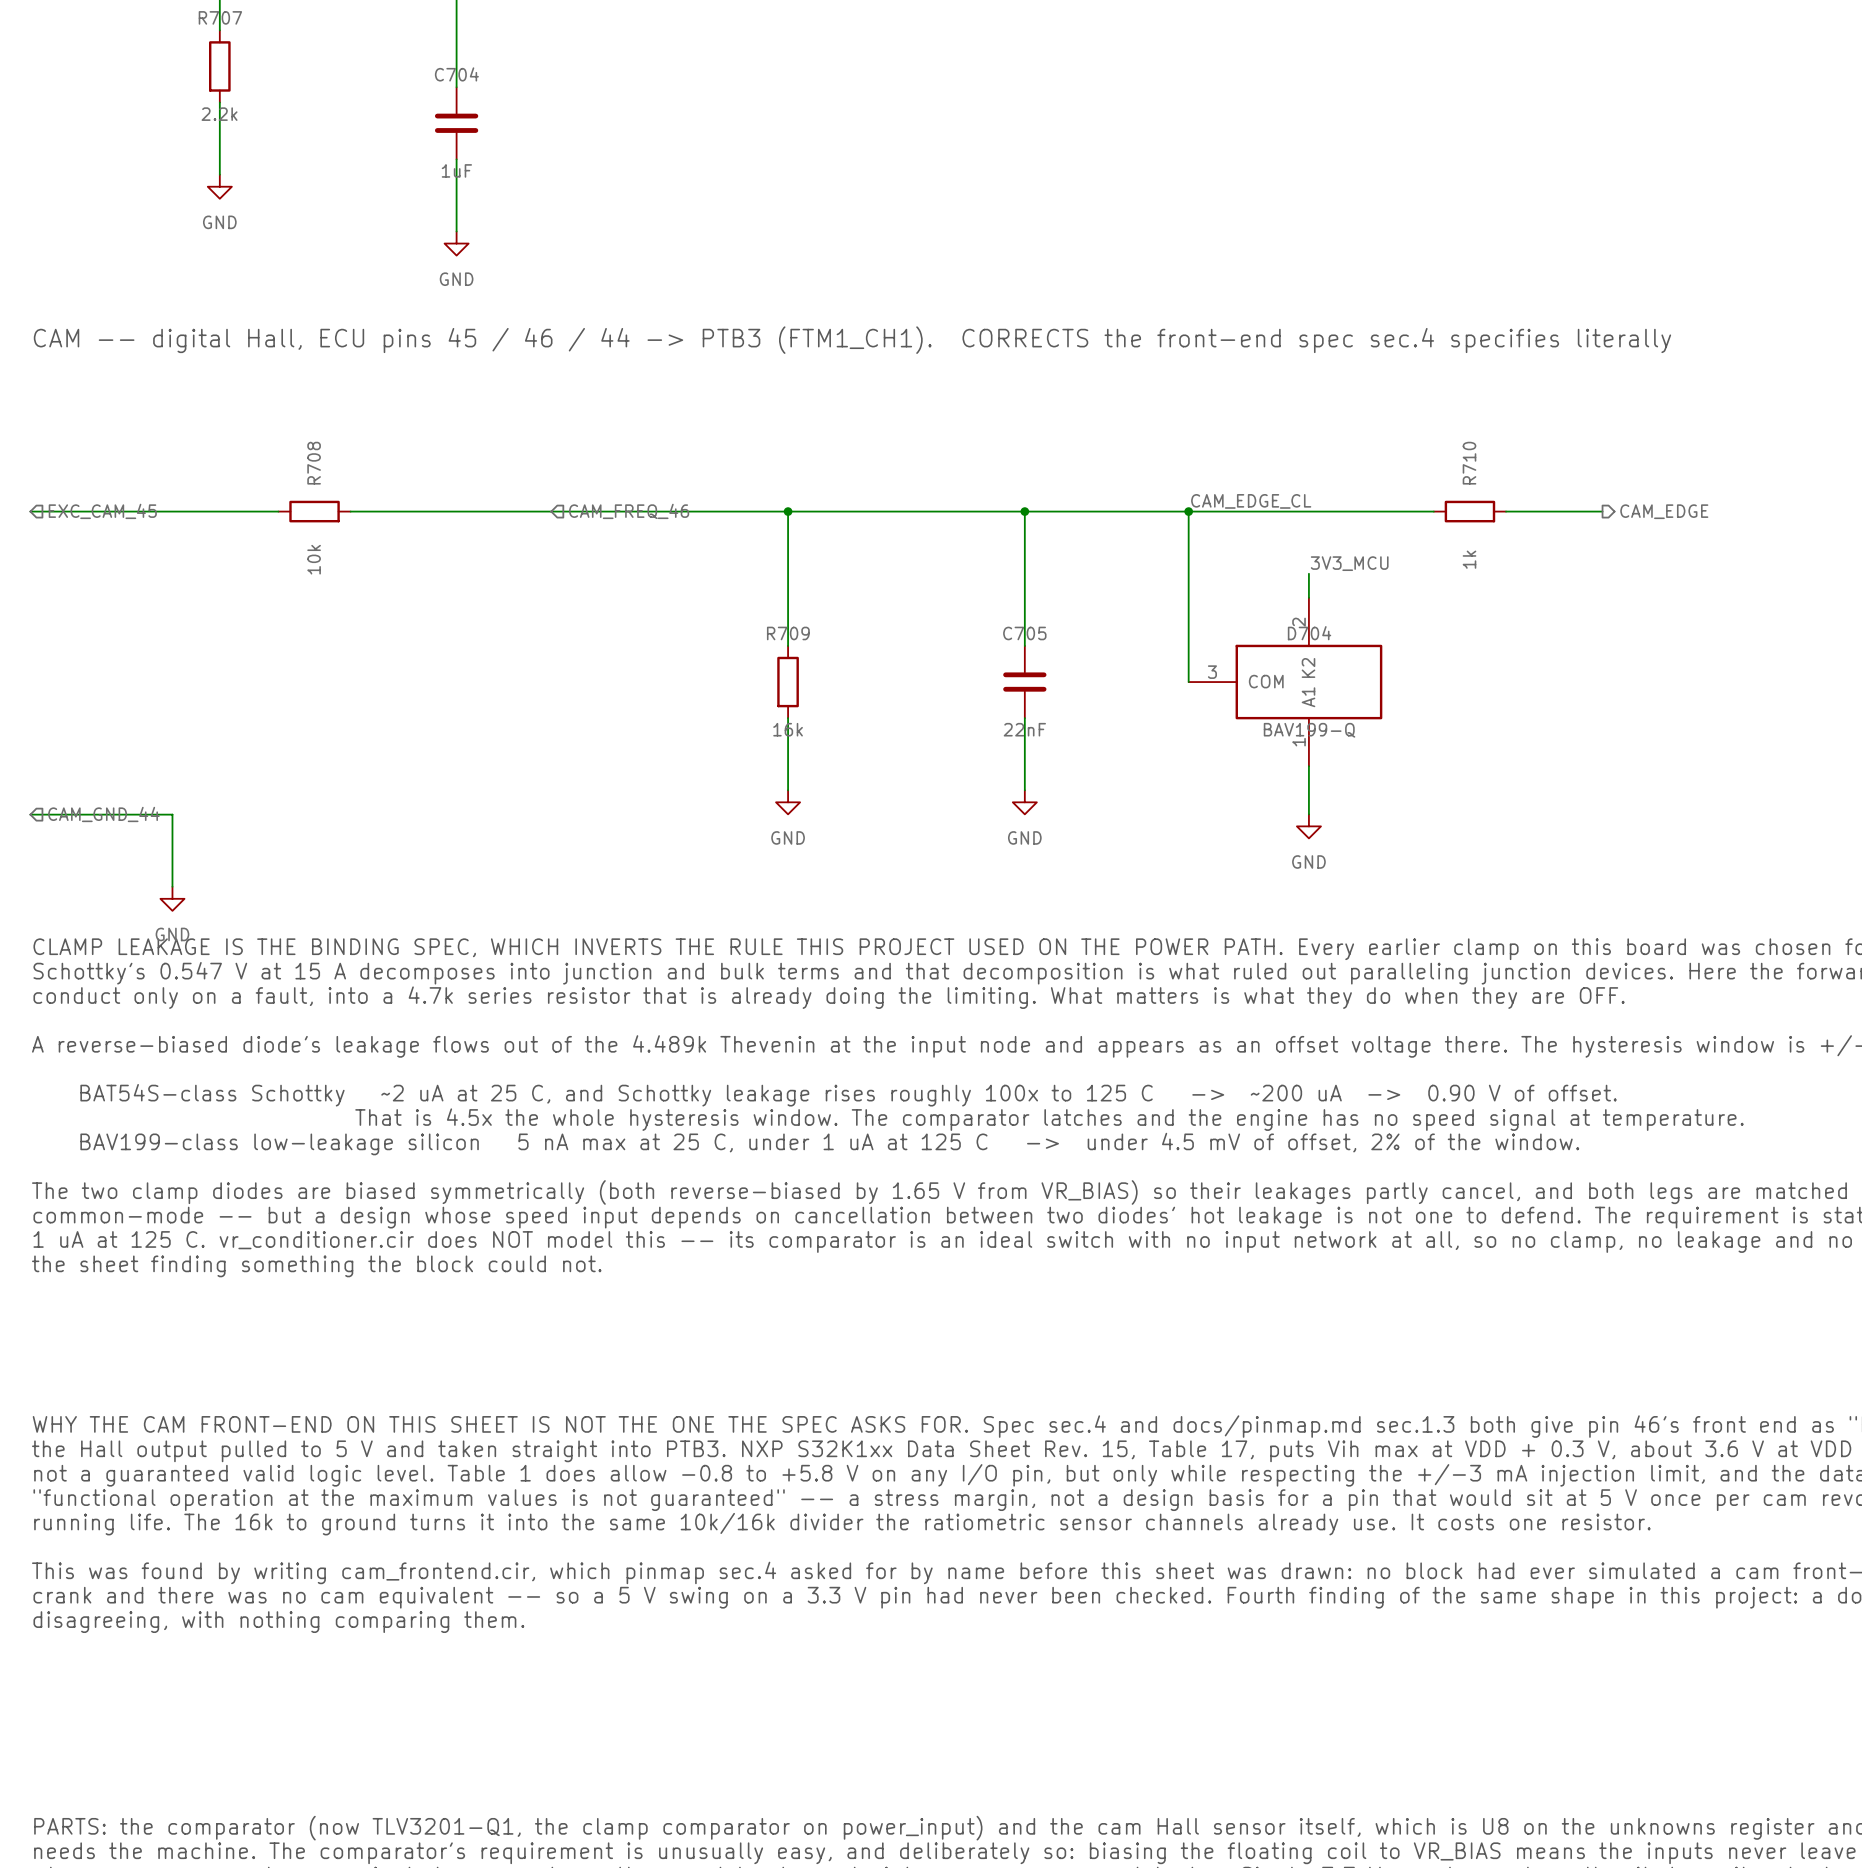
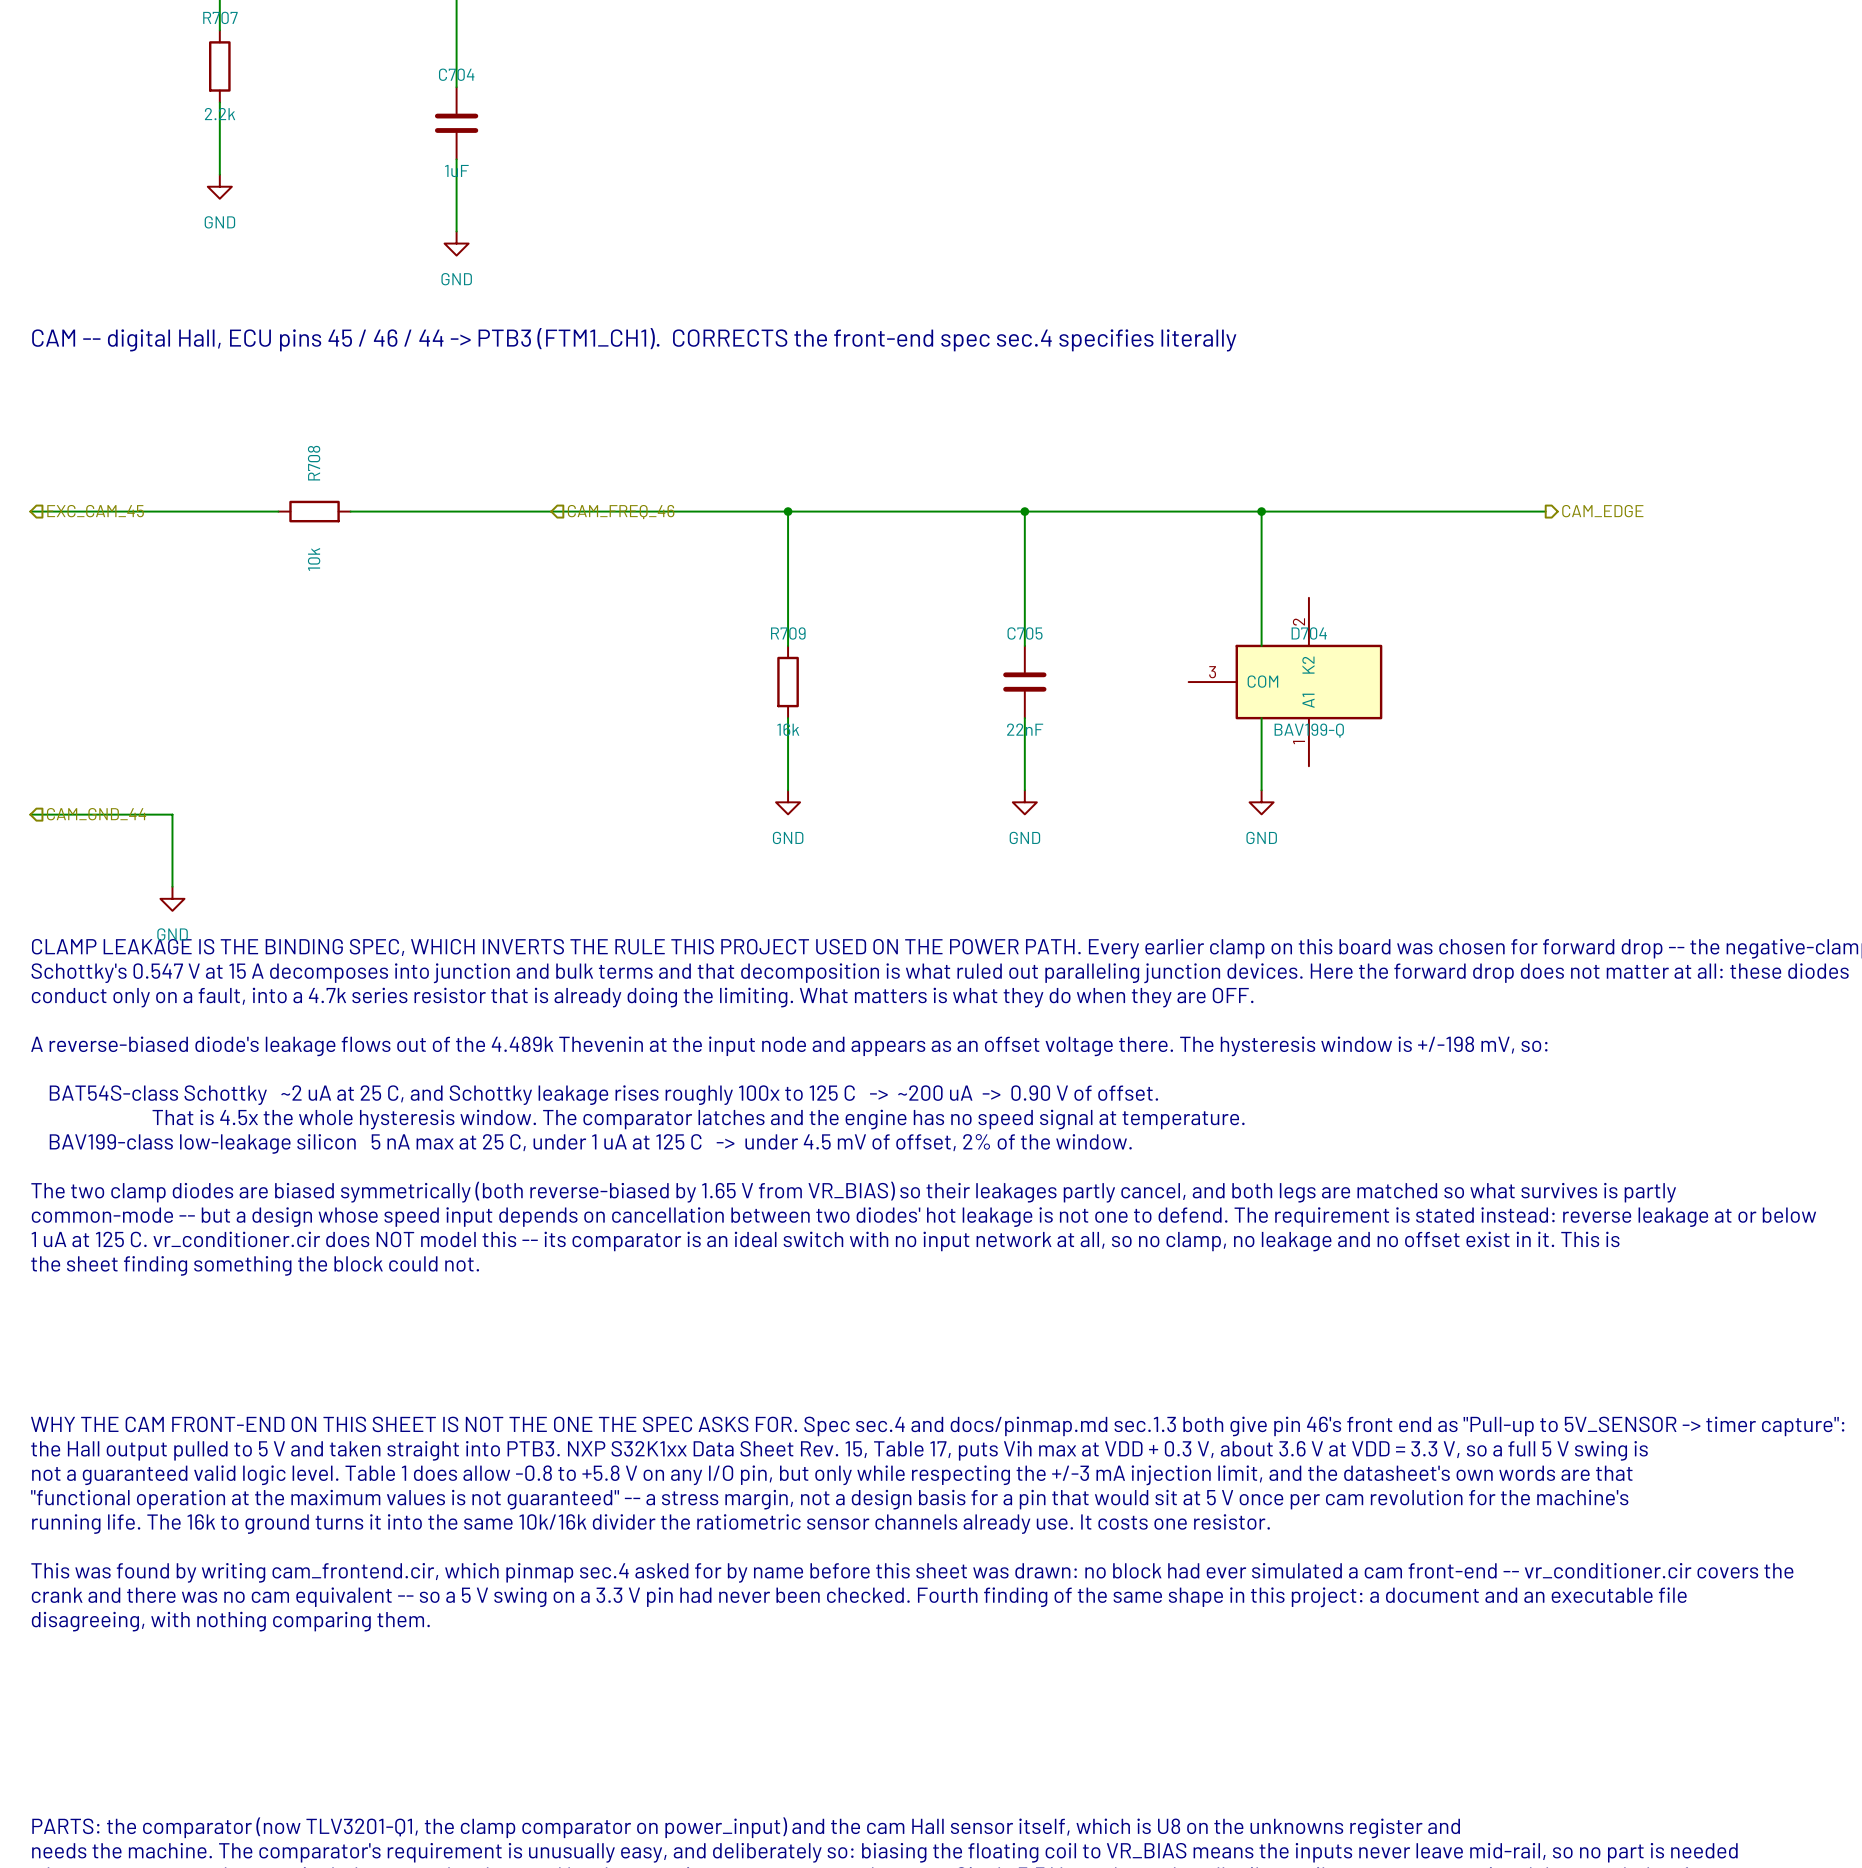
label: CAM_EDGE_CL (1251, 501) -> none
wire: (1188, 511) (1188, 682) -> none
junction: (1188, 511) -> none
wire: none -> (1261, 511) (1261, 645)
junction: none -> (1261, 511)
wire: none -> (1433, 511) (1506, 511)
R710: 1k (1469, 511) -> none
wire: (1545, 511) (1602, 511) -> none
hierarchical label position: CAM_EDGE (1664, 511) -> CAM_EDGE (1602, 511)
label: 3V3_MCU (1349, 563) -> none
wire: (1308, 573) (1308, 597) -> none
wire: none -> (1261, 718) (1261, 790)
wire: (1308, 766) (1308, 814) -> none
power symbol position: GND (1308, 826) -> GND (1261, 802)

